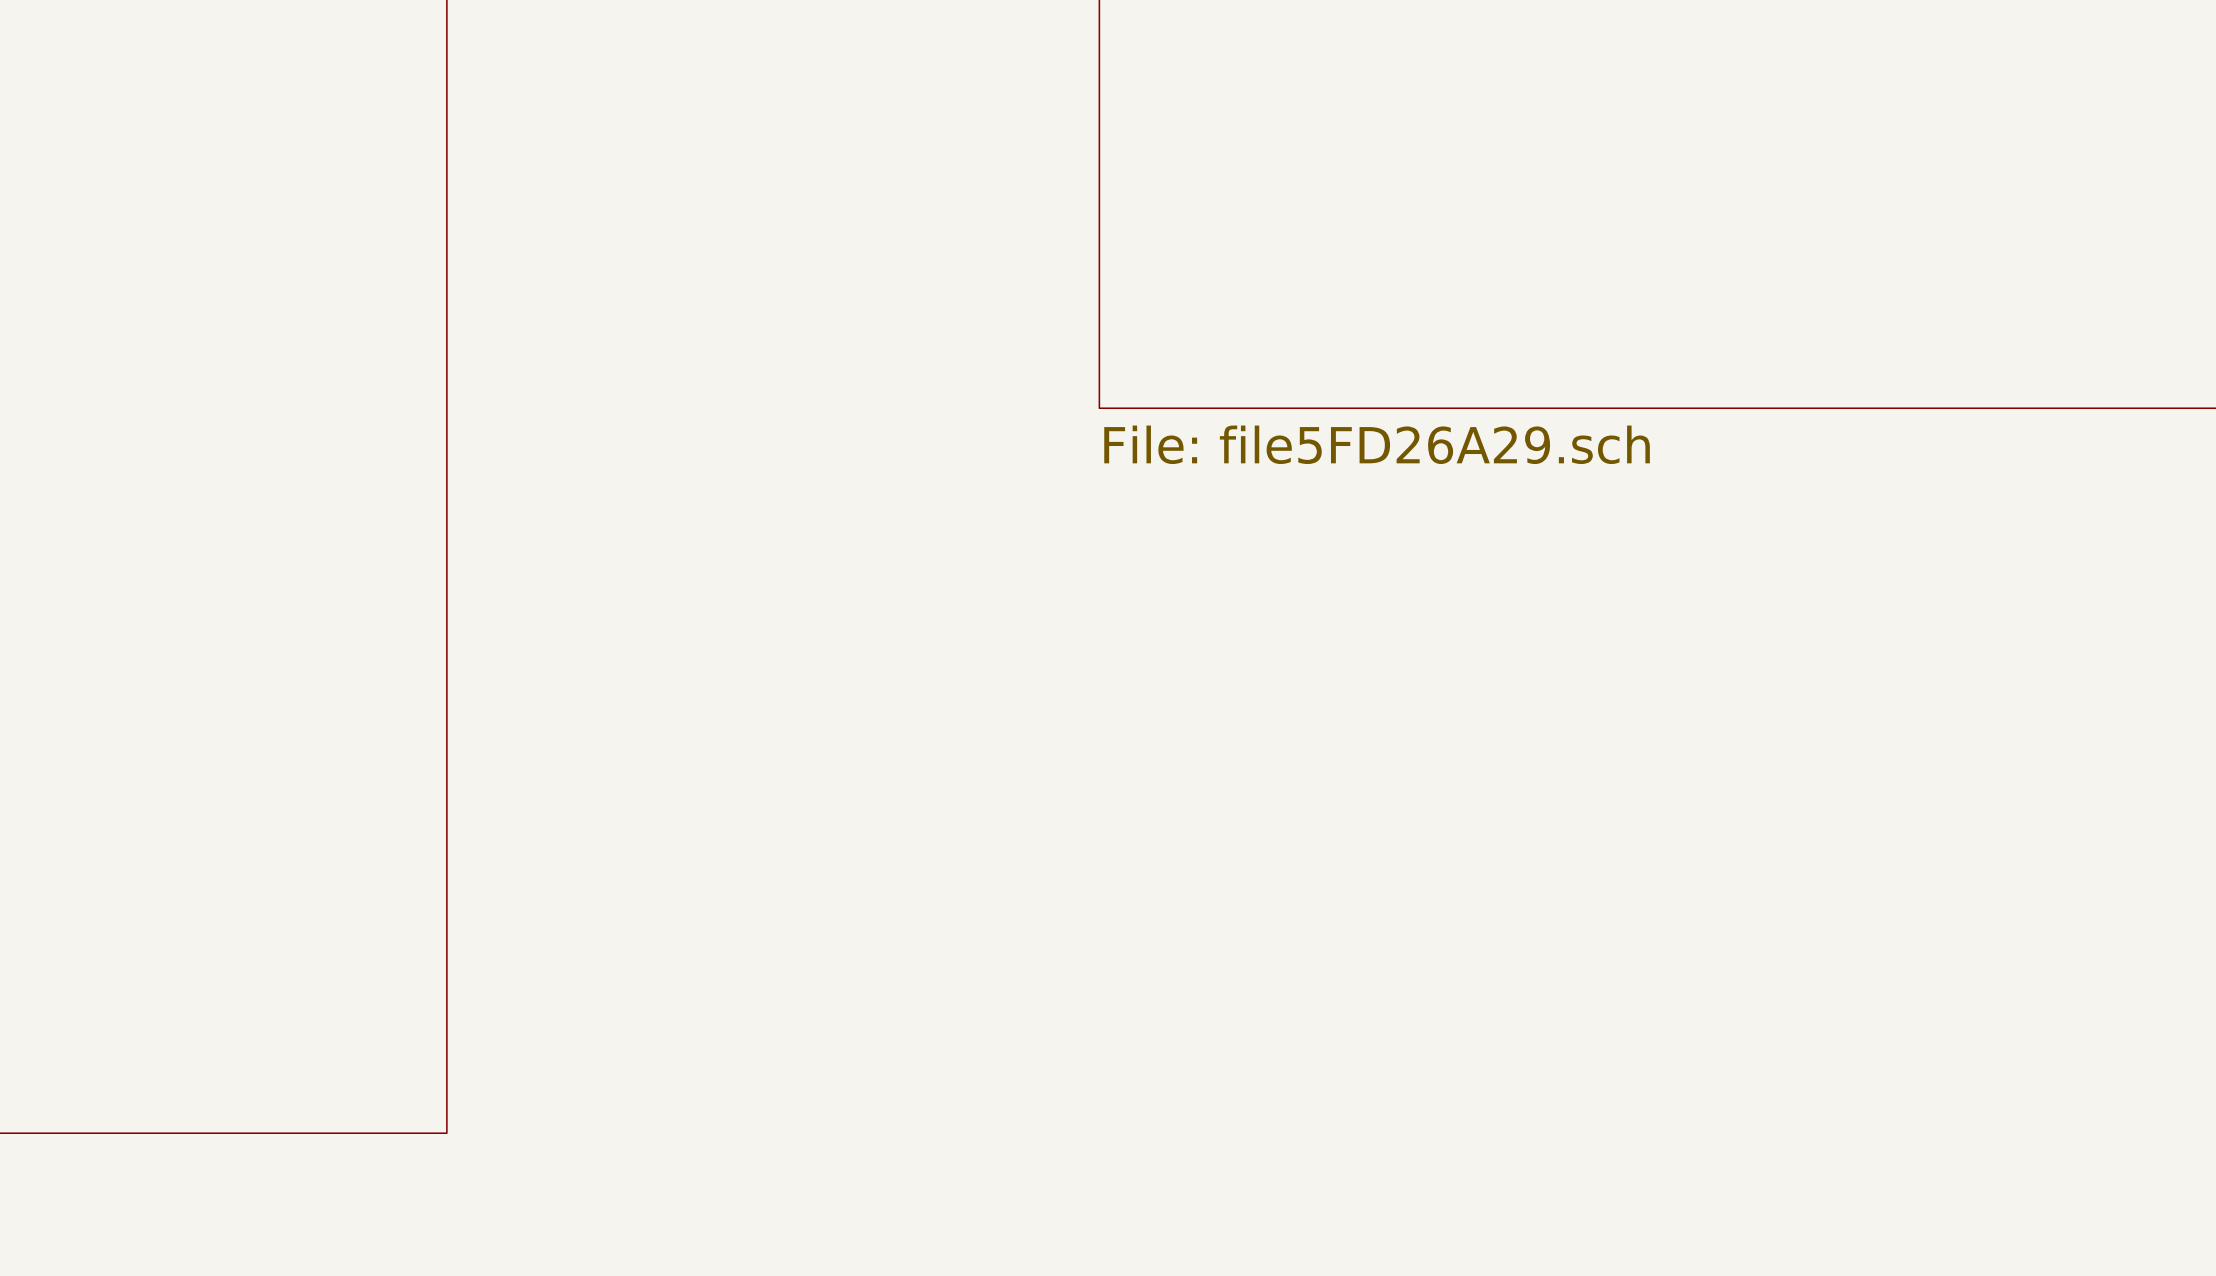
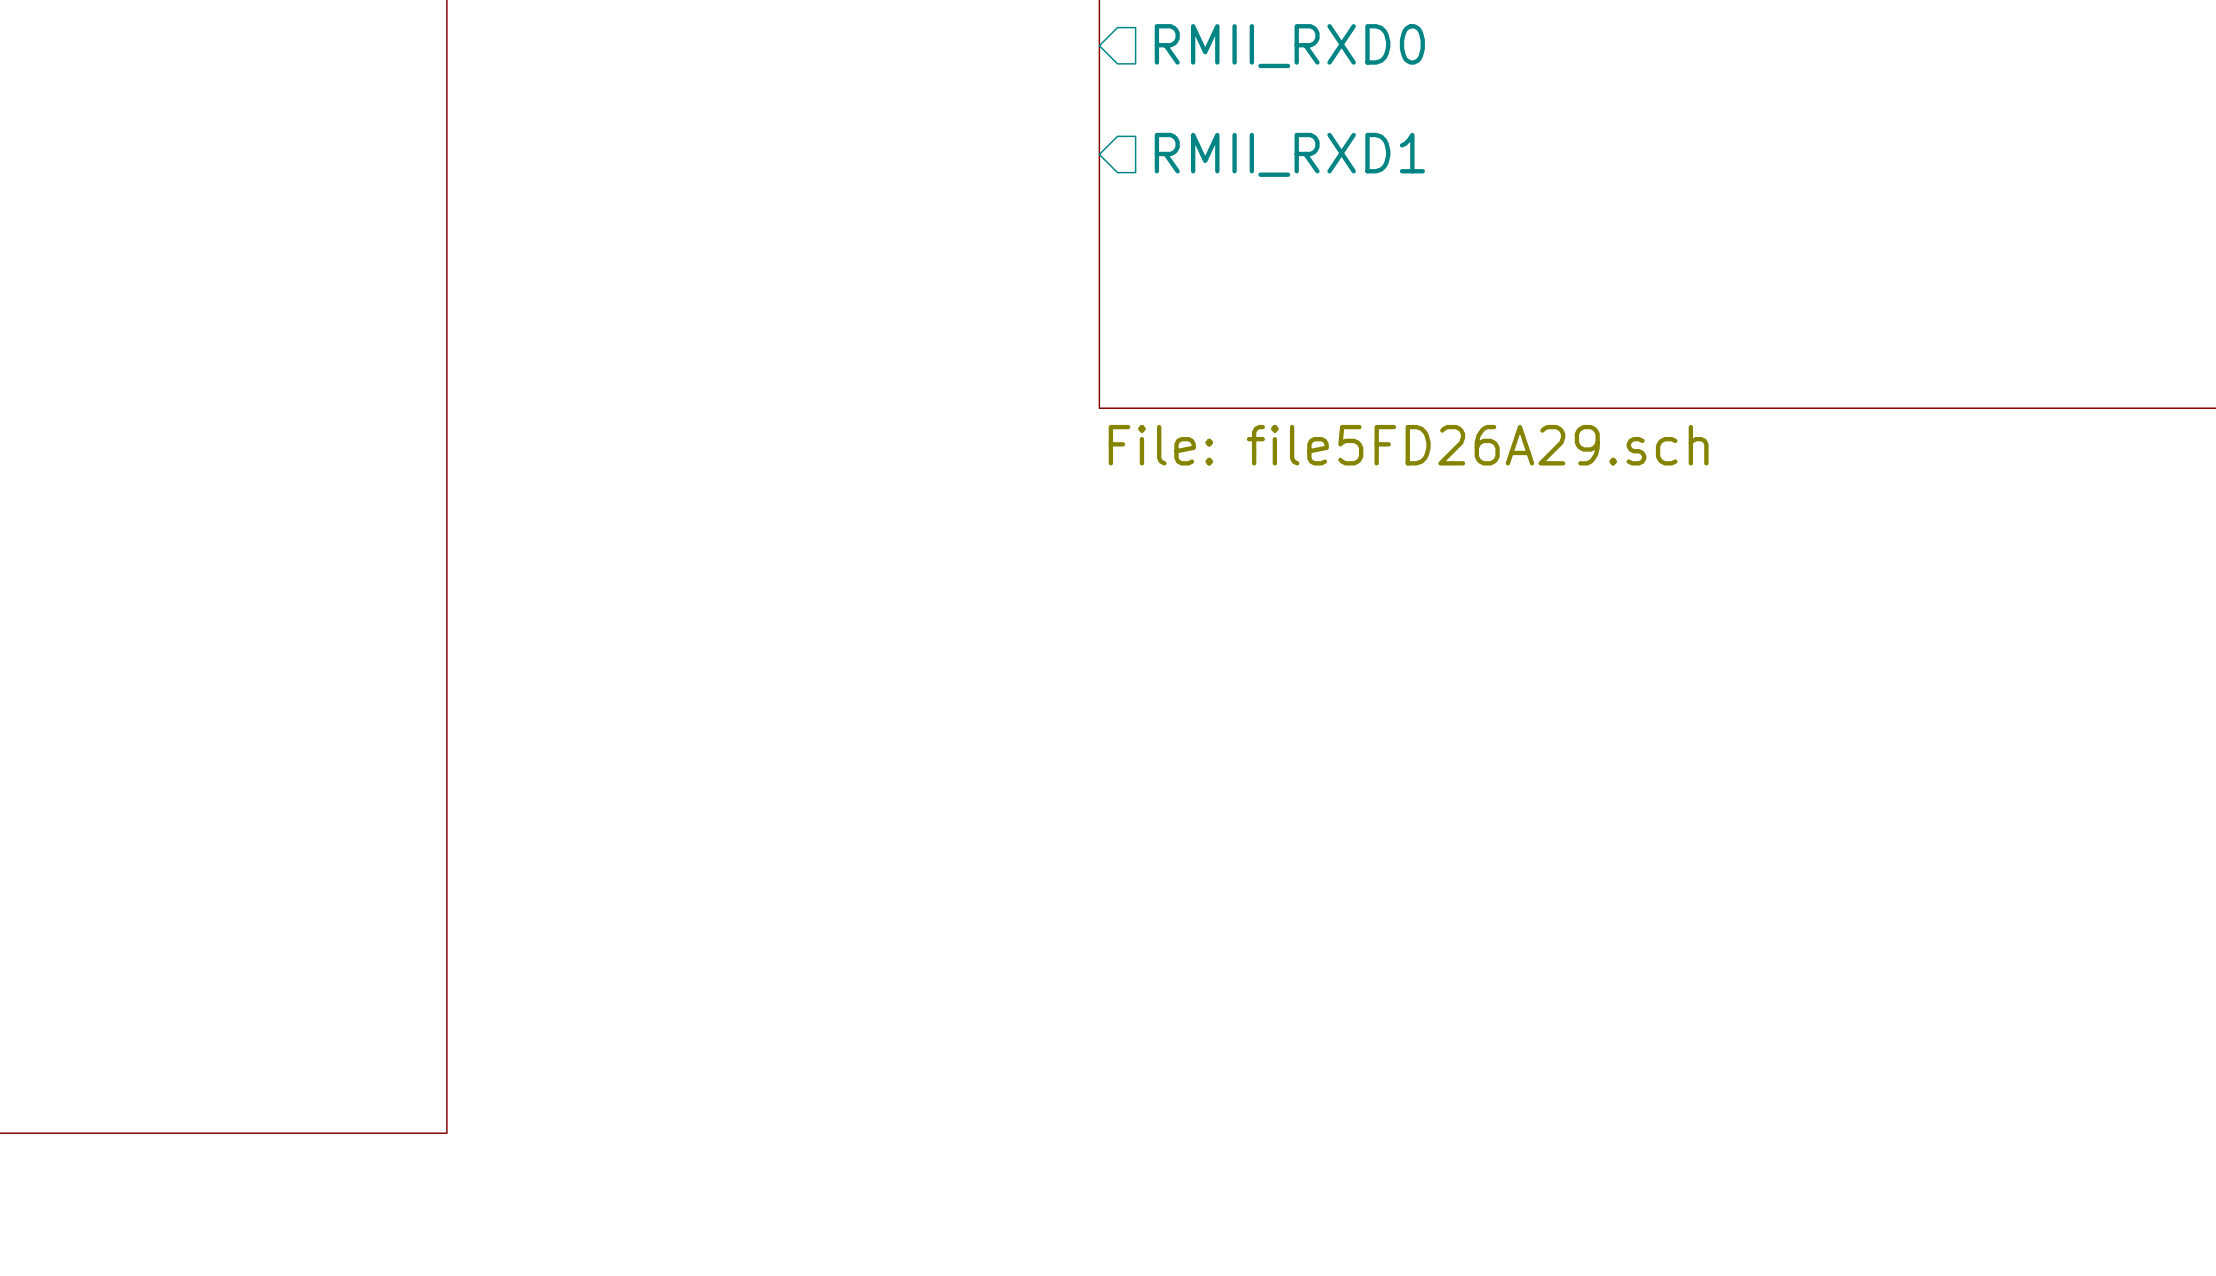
sheet pin: none -> RMII_RXD0 (1289, 46)
sheet pin: none -> RMII_RXD1 (1289, 154)

